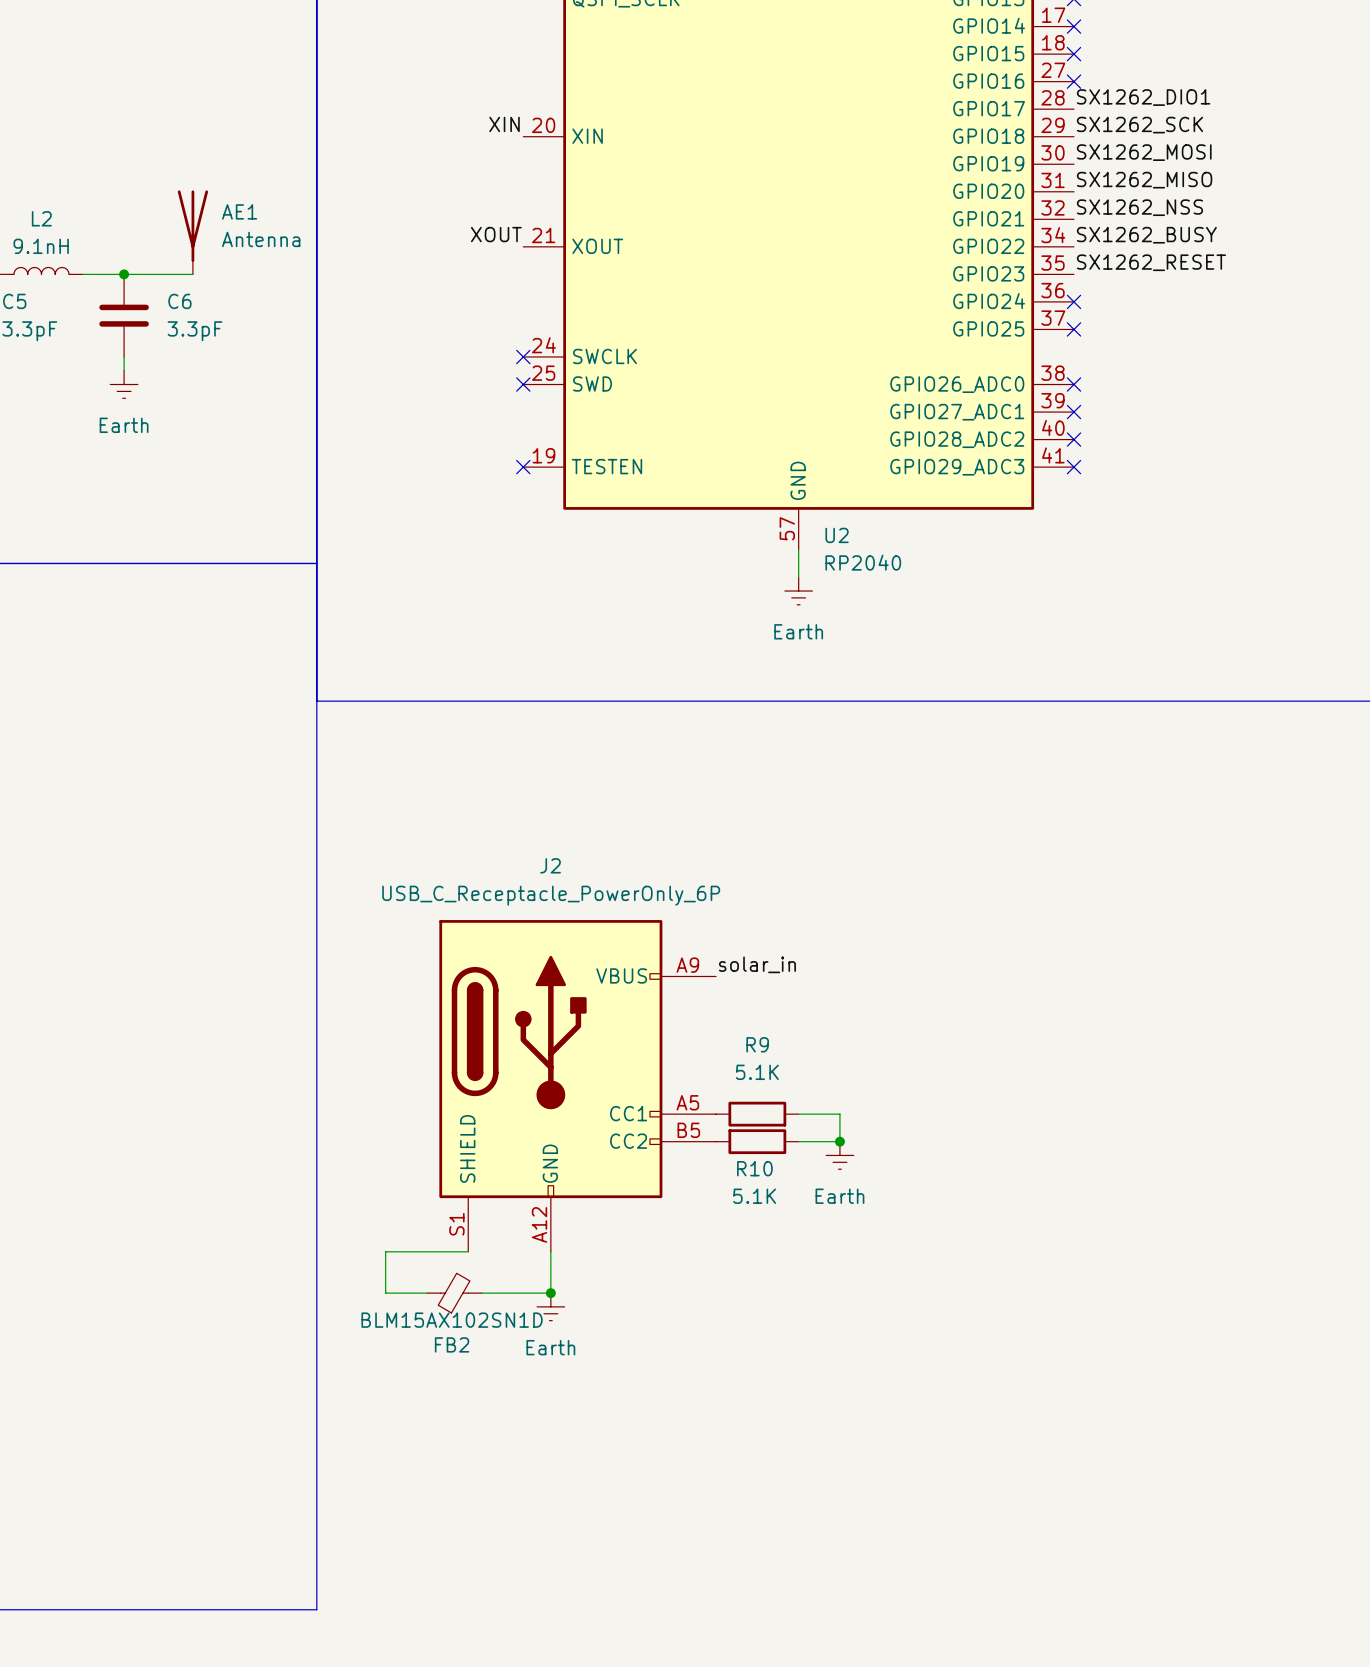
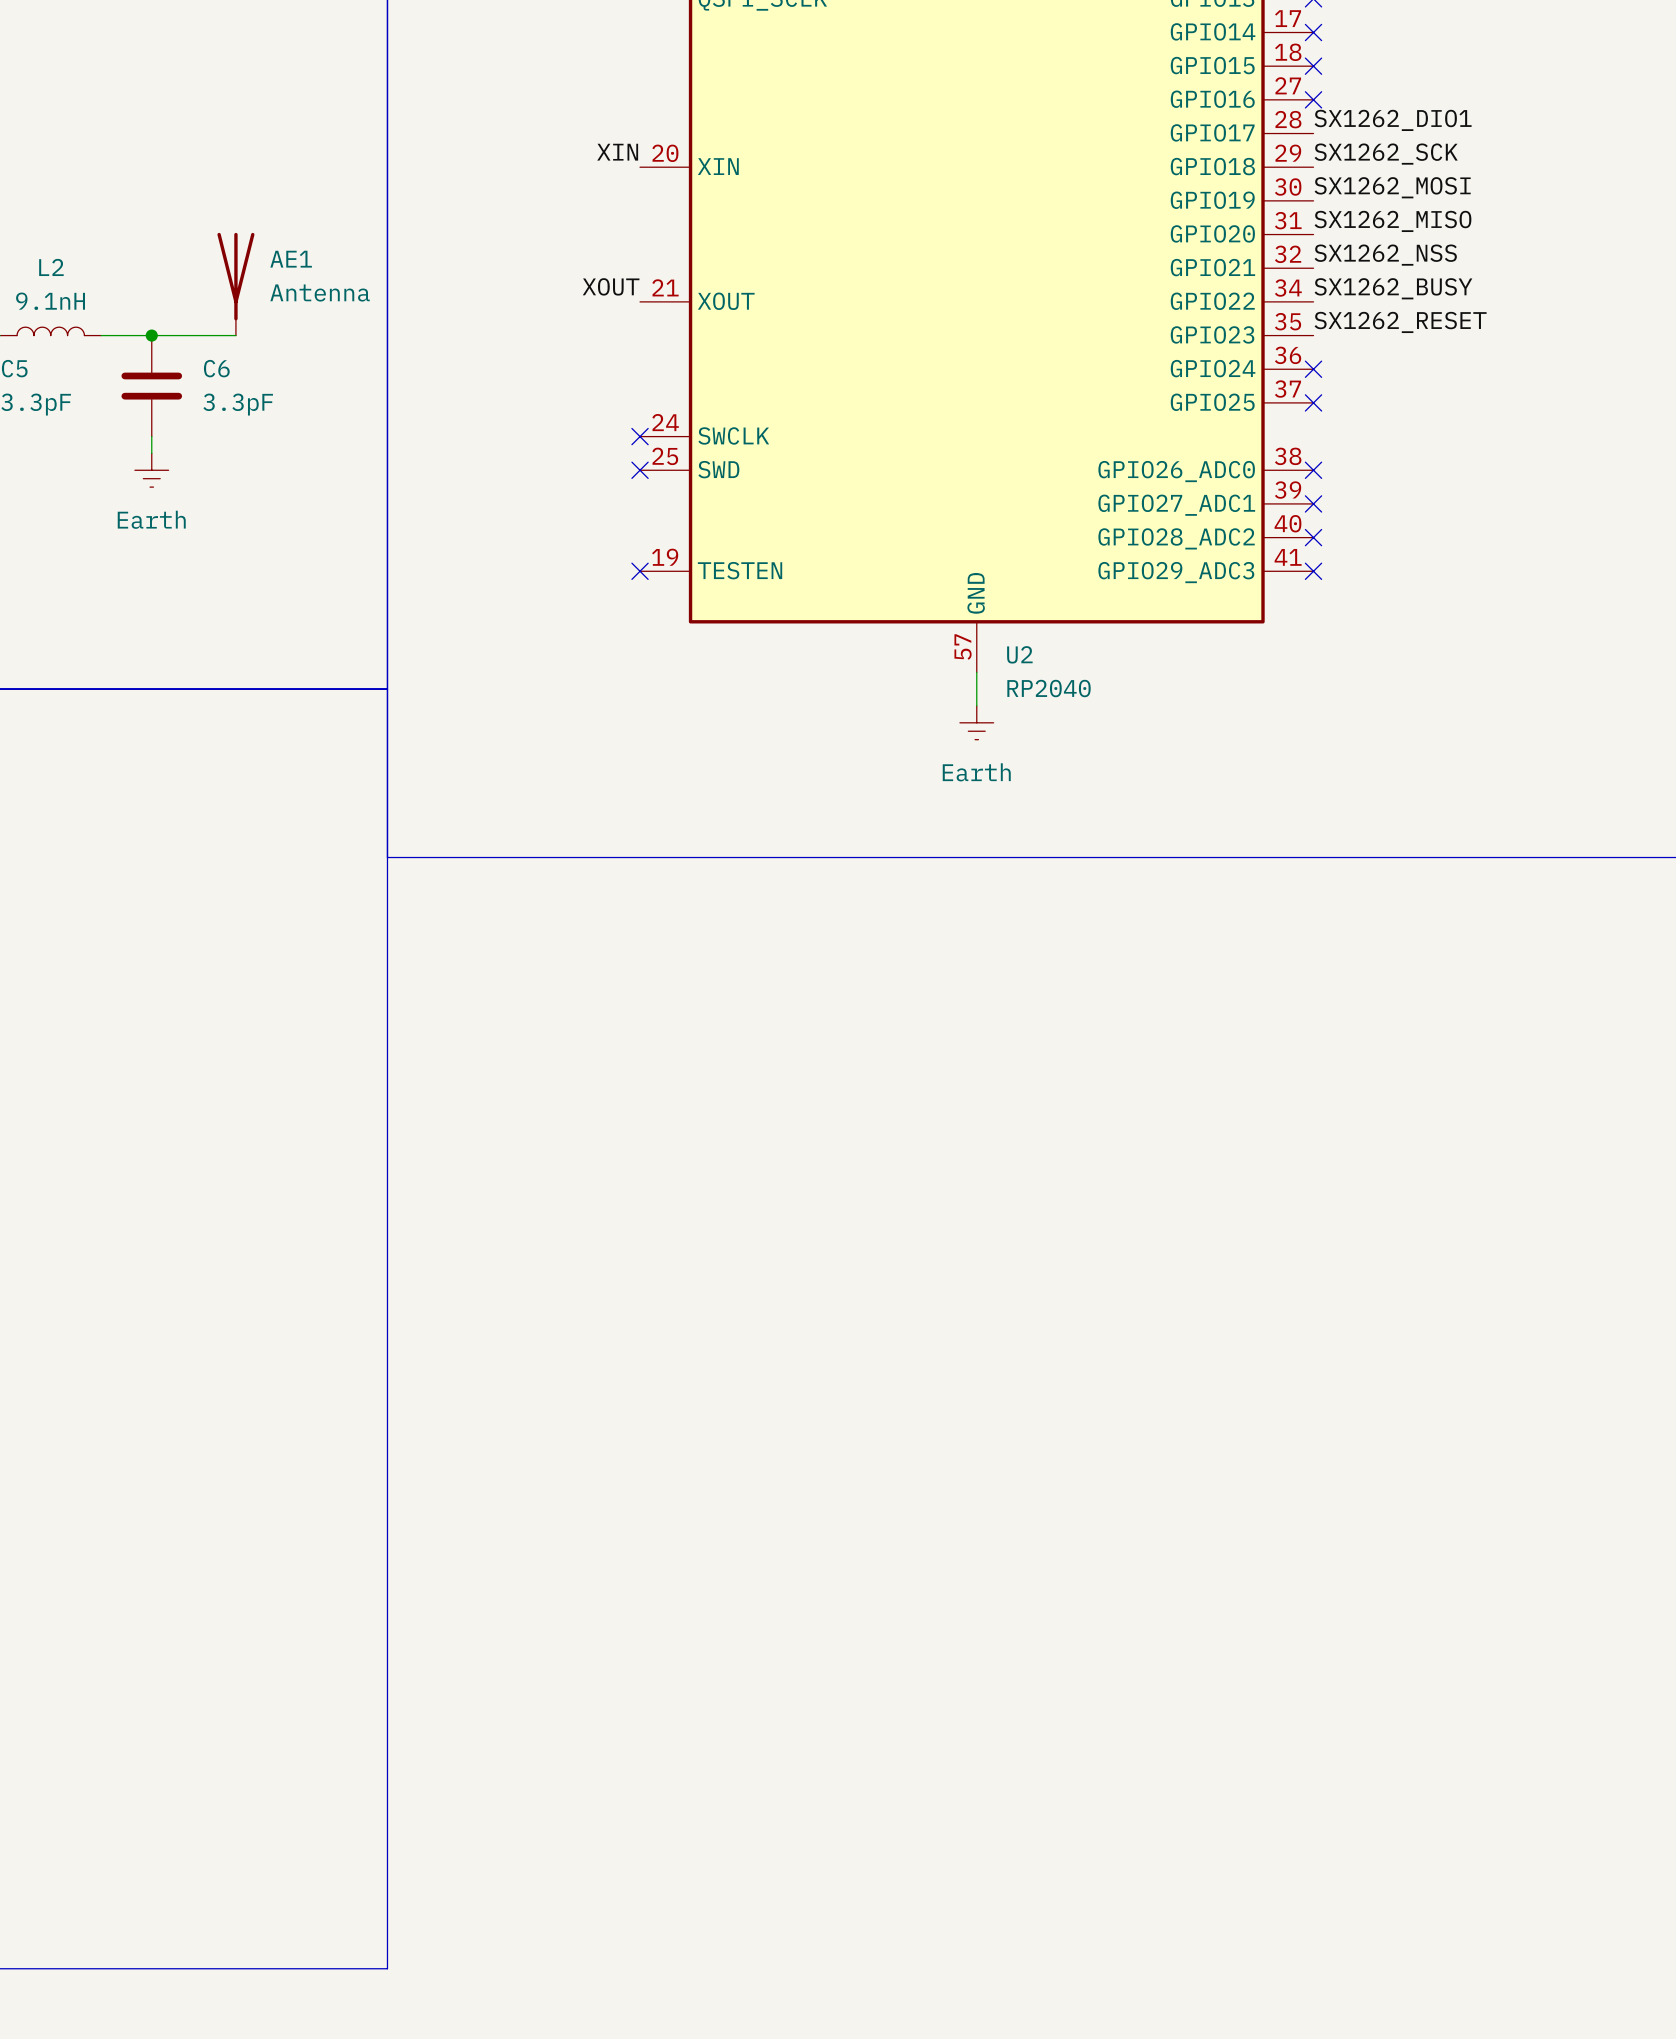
label: solar_in (757, 964) -> none
J2: USB_C_Receptacle_PowerOnly_6P (577, 1085) -> none
R9: 5.1K (757, 1114) -> none
wire: (798, 1114) (839, 1114) (839, 1141) (798, 1141) -> none
R10: 5.1K (757, 1141) -> none
junction: (839, 1141) -> none
power symbol: Earth (839, 1155) -> none
wire: (468, 1251) (385, 1251) (385, 1293) (426, 1293) -> none
wire: (550, 1251) (550, 1293) (482, 1293) -> none
FB2: BLM15AX102SN1D (454, 1293) -> none
junction: (550, 1293) -> none
power symbol: Earth (550, 1306) -> none

